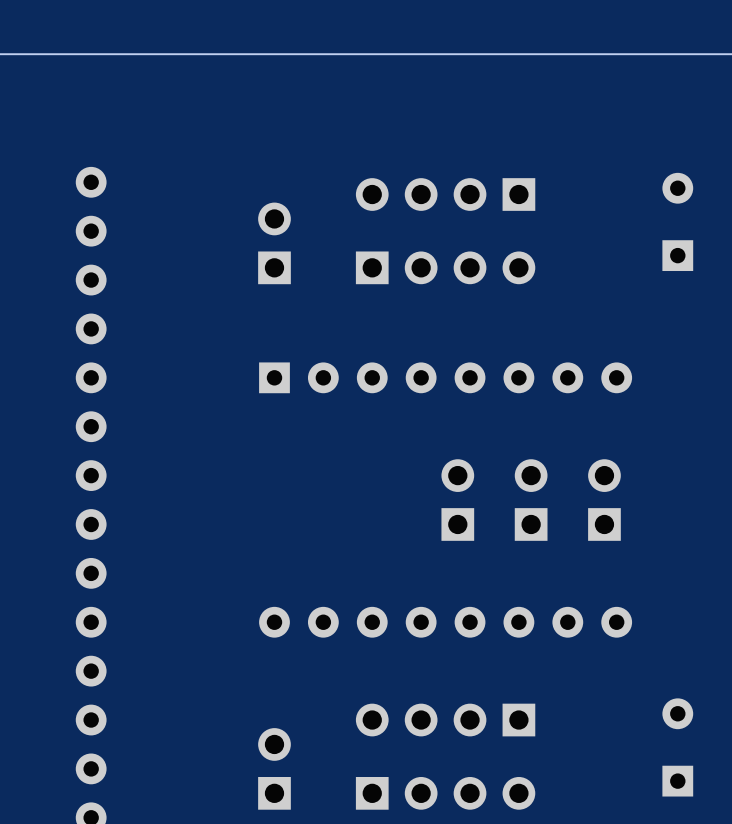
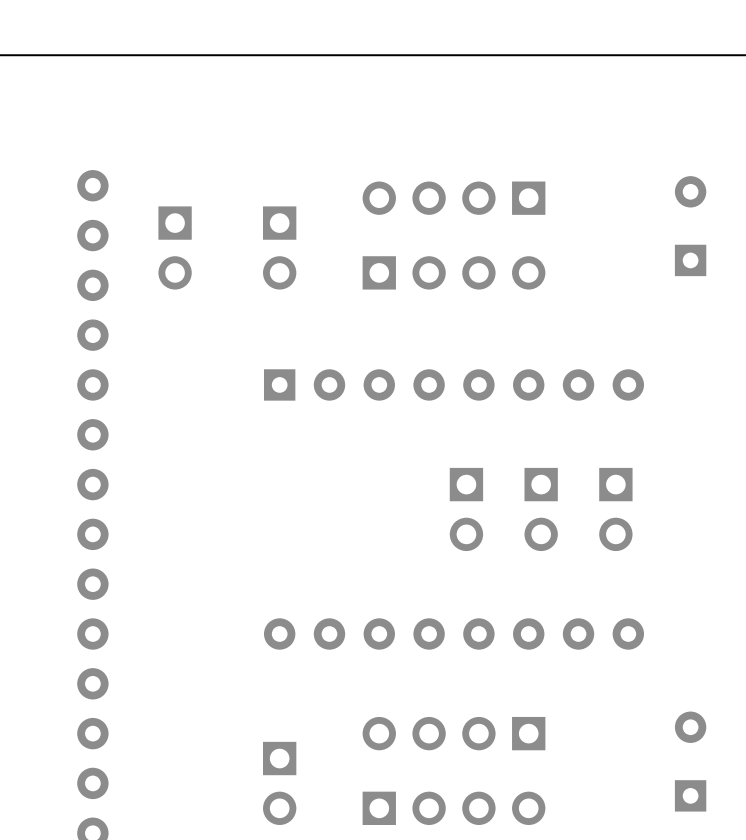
part: none -> (175, 247)
part rotation: 0° (274, 243) -> 180° (279, 247)
part rotation: 0° (457, 500) -> 180° (466, 509)
part rotation: 0° (531, 500) -> 180° (541, 509)
part rotation: 0° (604, 500) -> 180° (615, 509)
part rotation: 0° (274, 768) -> 180° (279, 783)

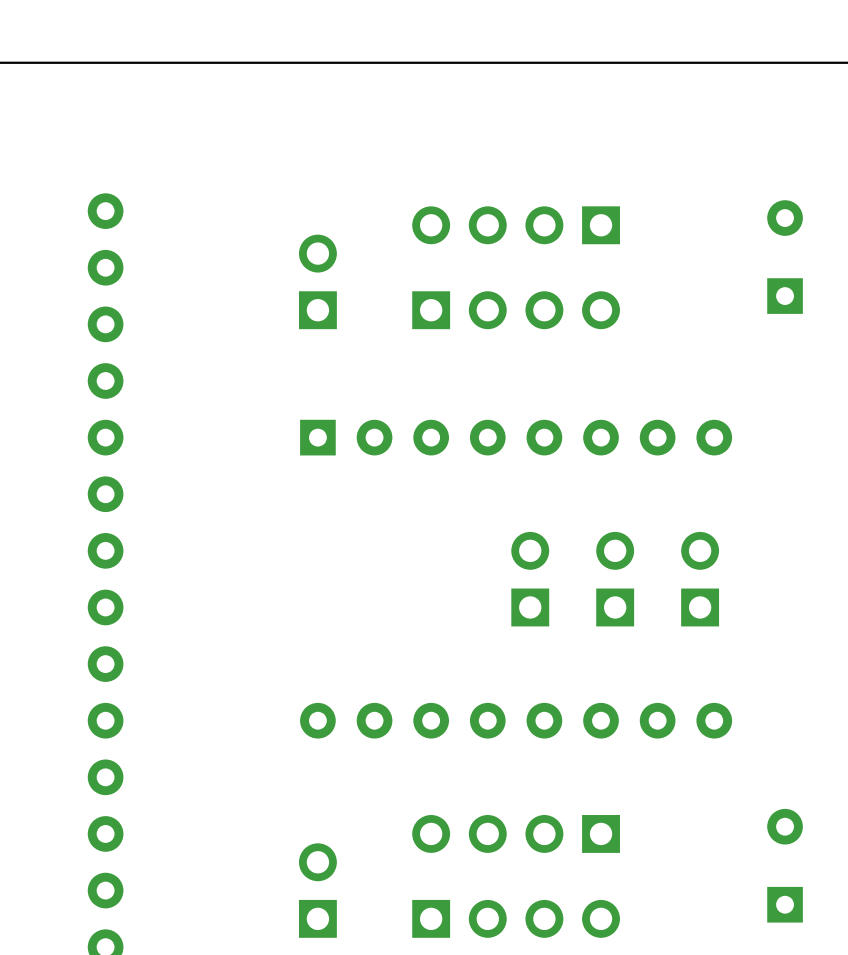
part: (175, 247) -> none
part rotation: 0° (279, 247) -> 180° (317, 281)
part rotation: 0° (466, 509) -> 180° (530, 579)
part rotation: 0° (541, 509) -> 180° (615, 579)
part rotation: 0° (615, 509) -> 180° (700, 579)
part rotation: 0° (279, 783) -> 180° (317, 890)

